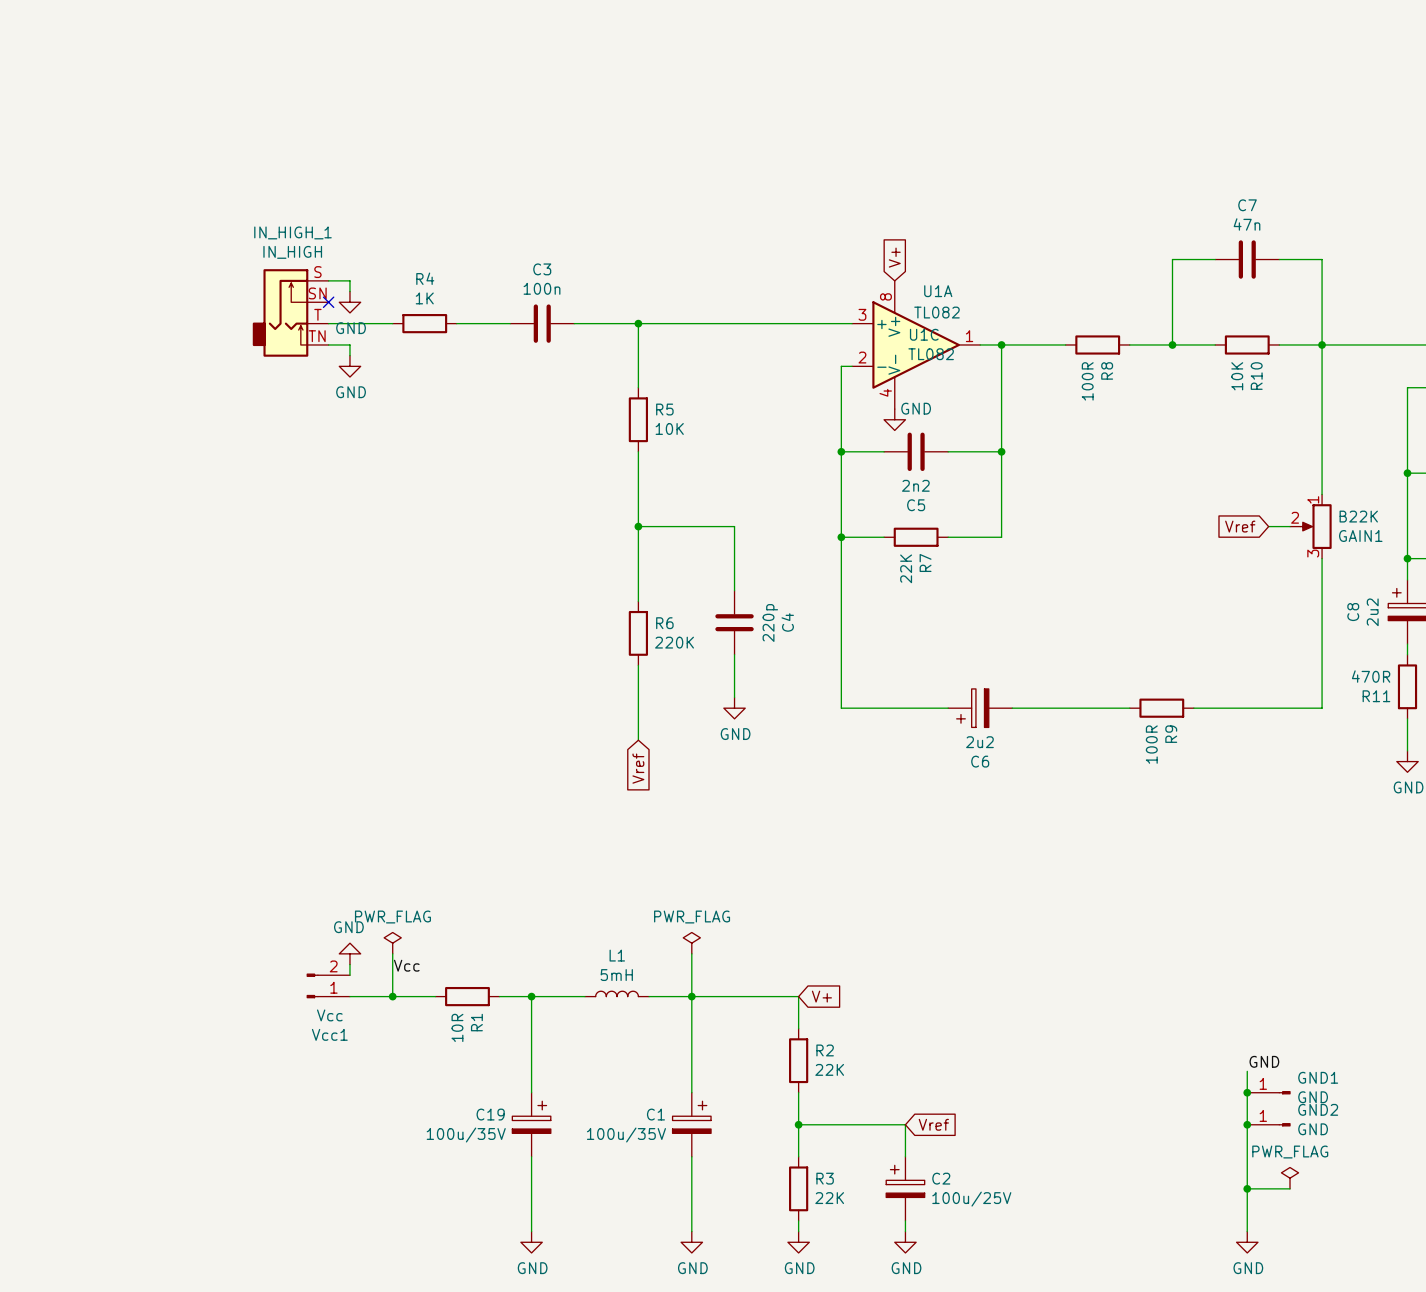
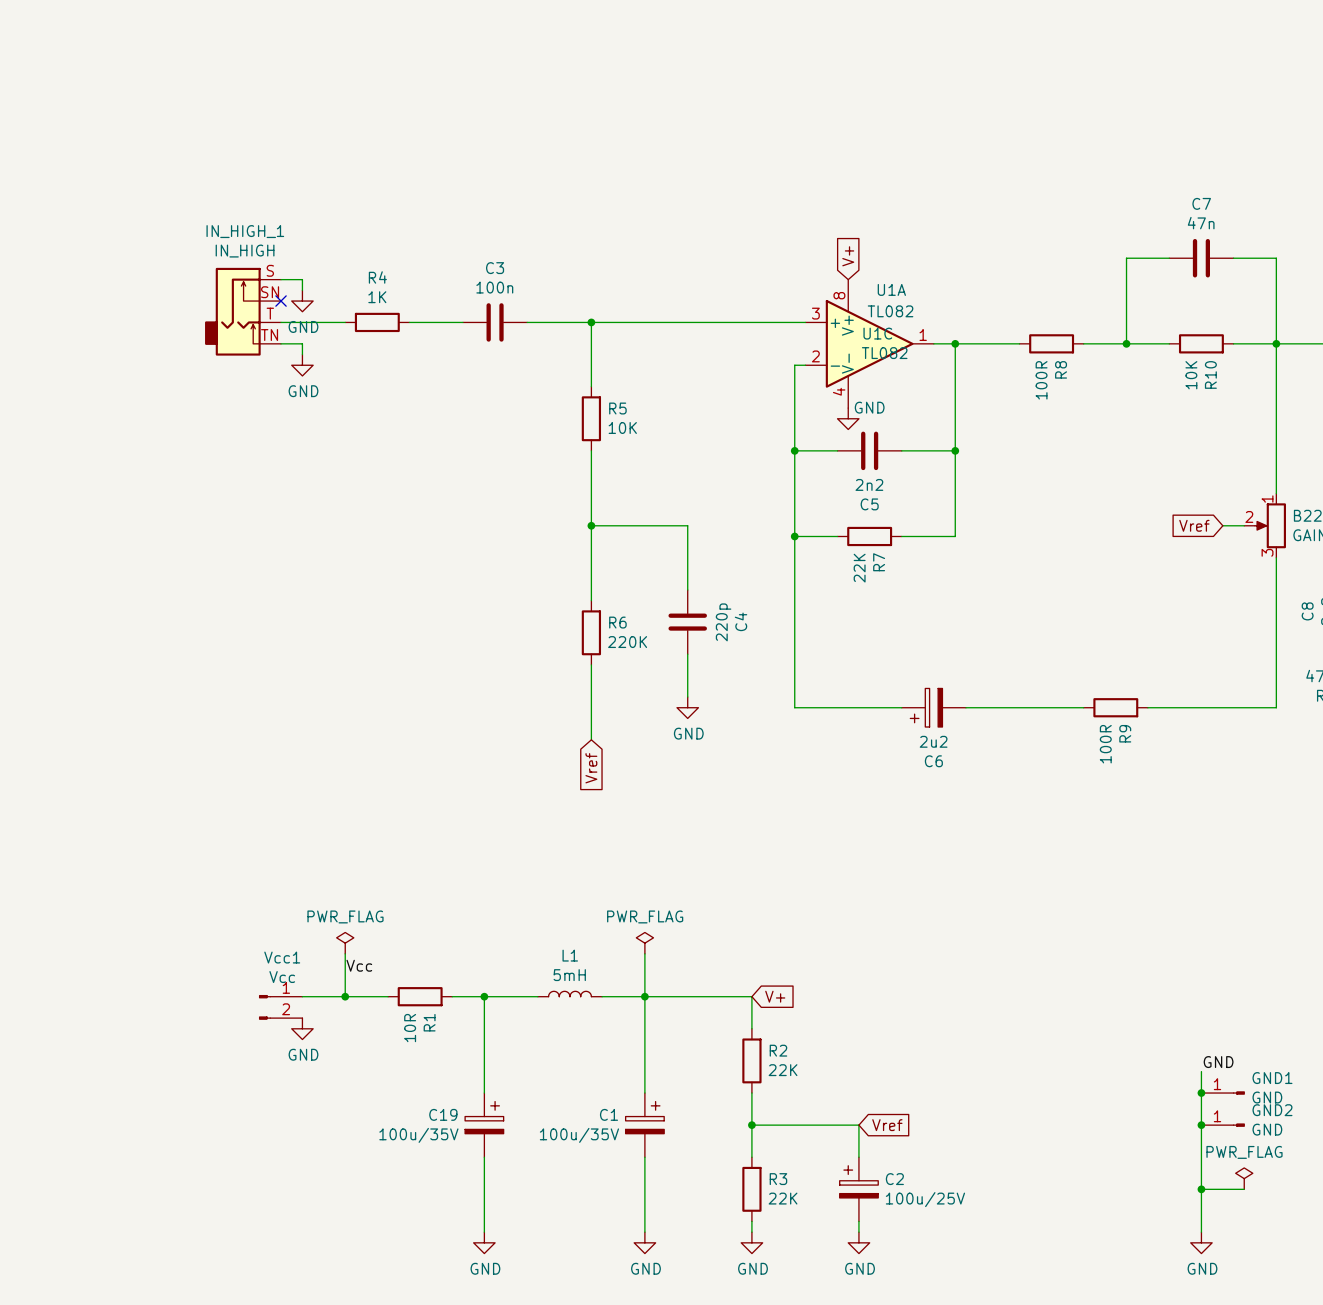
power symbol rotation: 0° (349, 953) -> 180° (302, 1028)
power symbol position: GND (349, 953) -> GND (302, 1028)
wire: (349, 964) (349, 975) -> none
Vcc1 flip: as is (312, 985) -> up-down (264, 1007)

